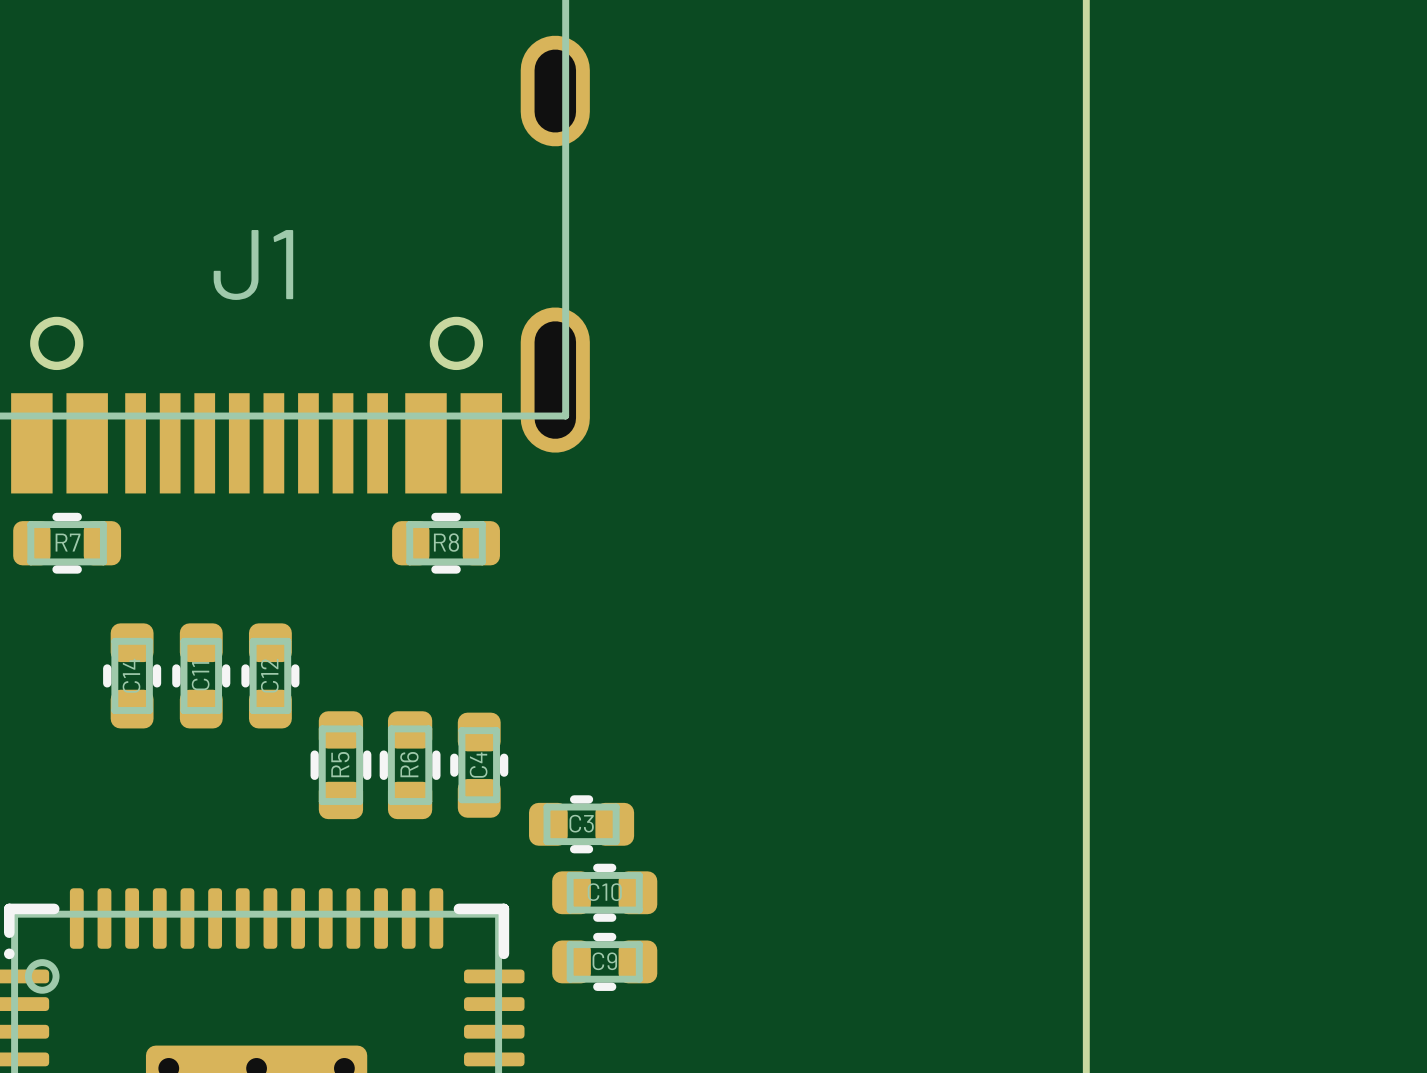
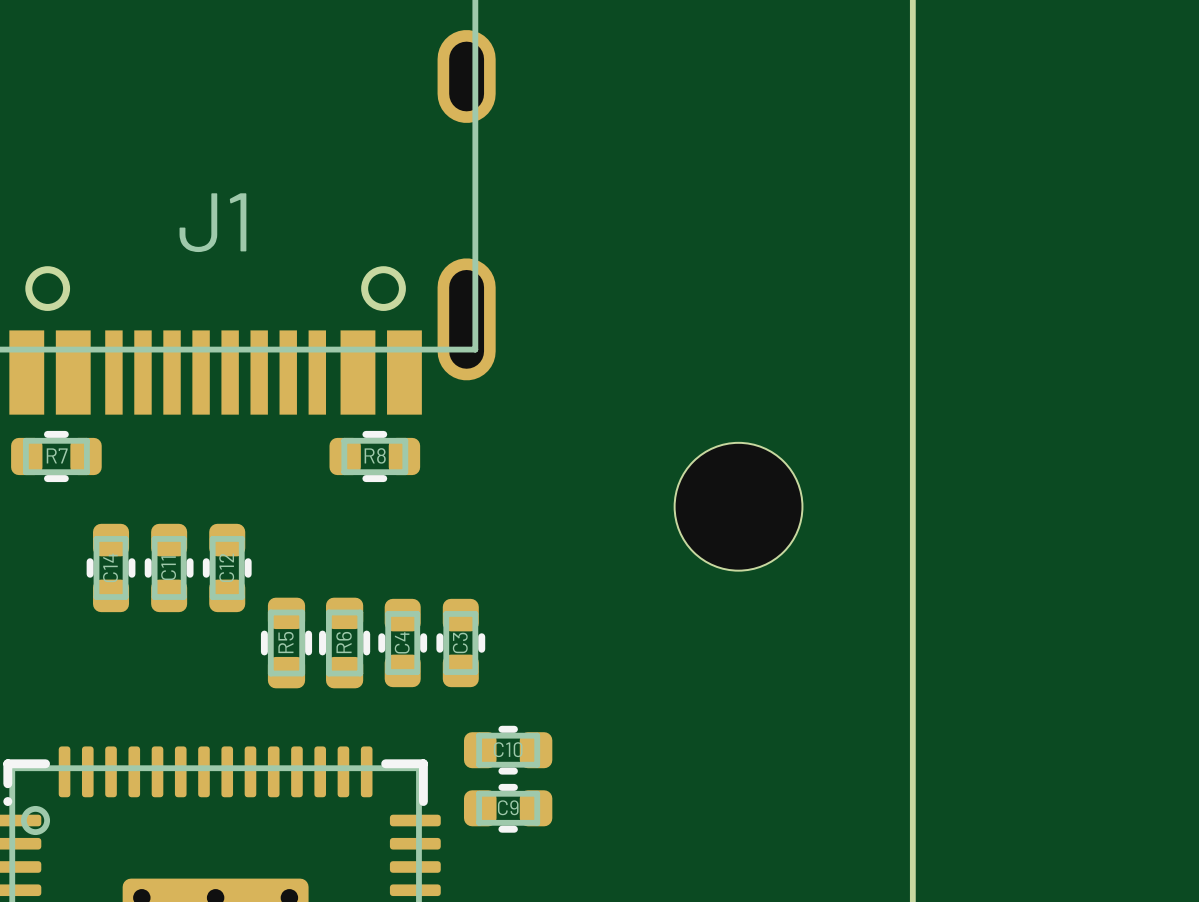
part: none -> (738, 506)
C3 rotation: 0° (581, 824) -> 90° clockwise (460, 643)
C3 position: (581, 824) -> (460, 643)

